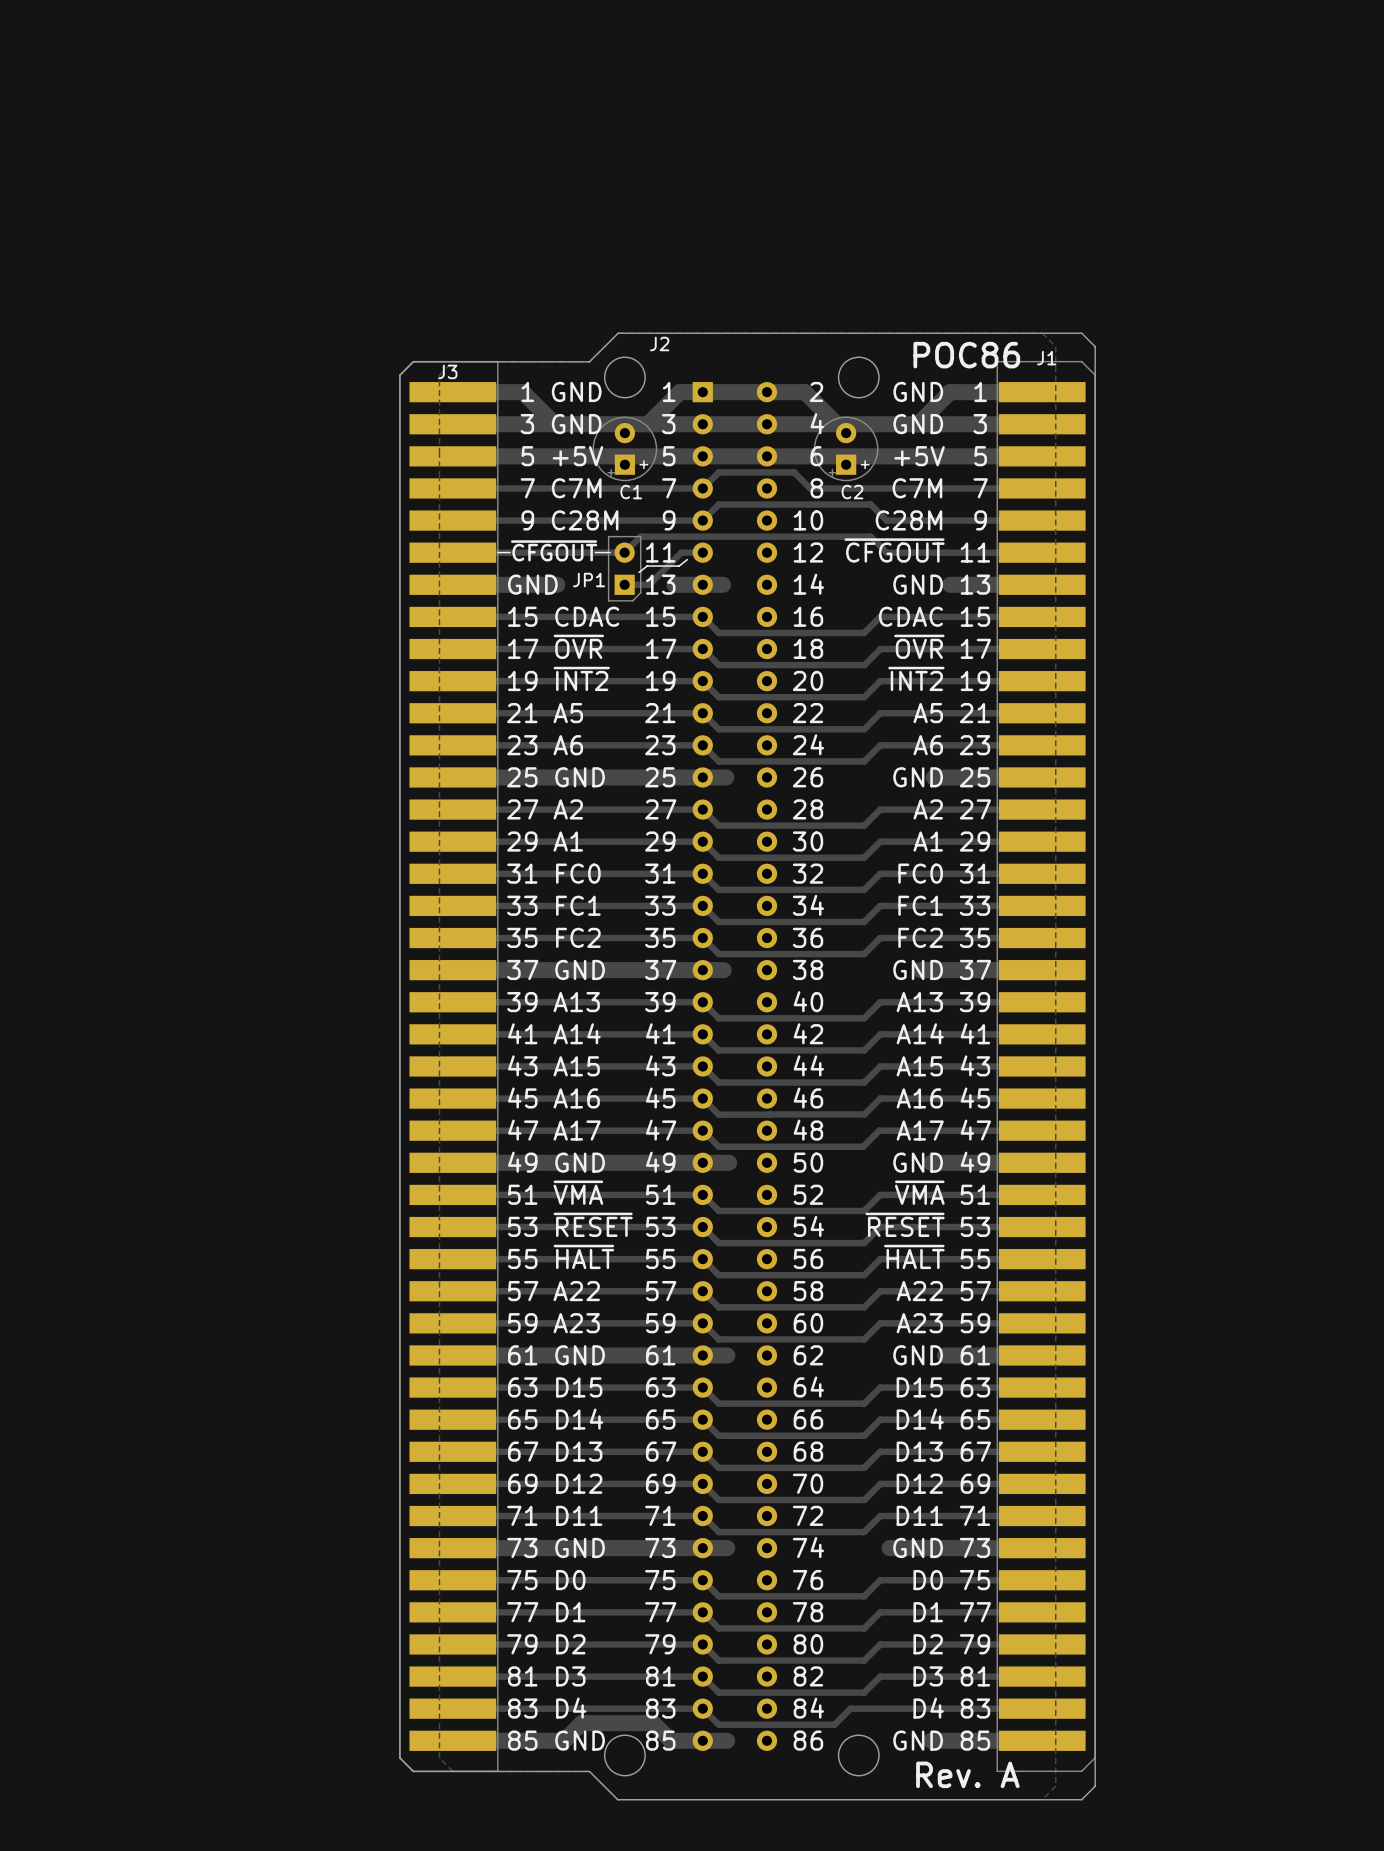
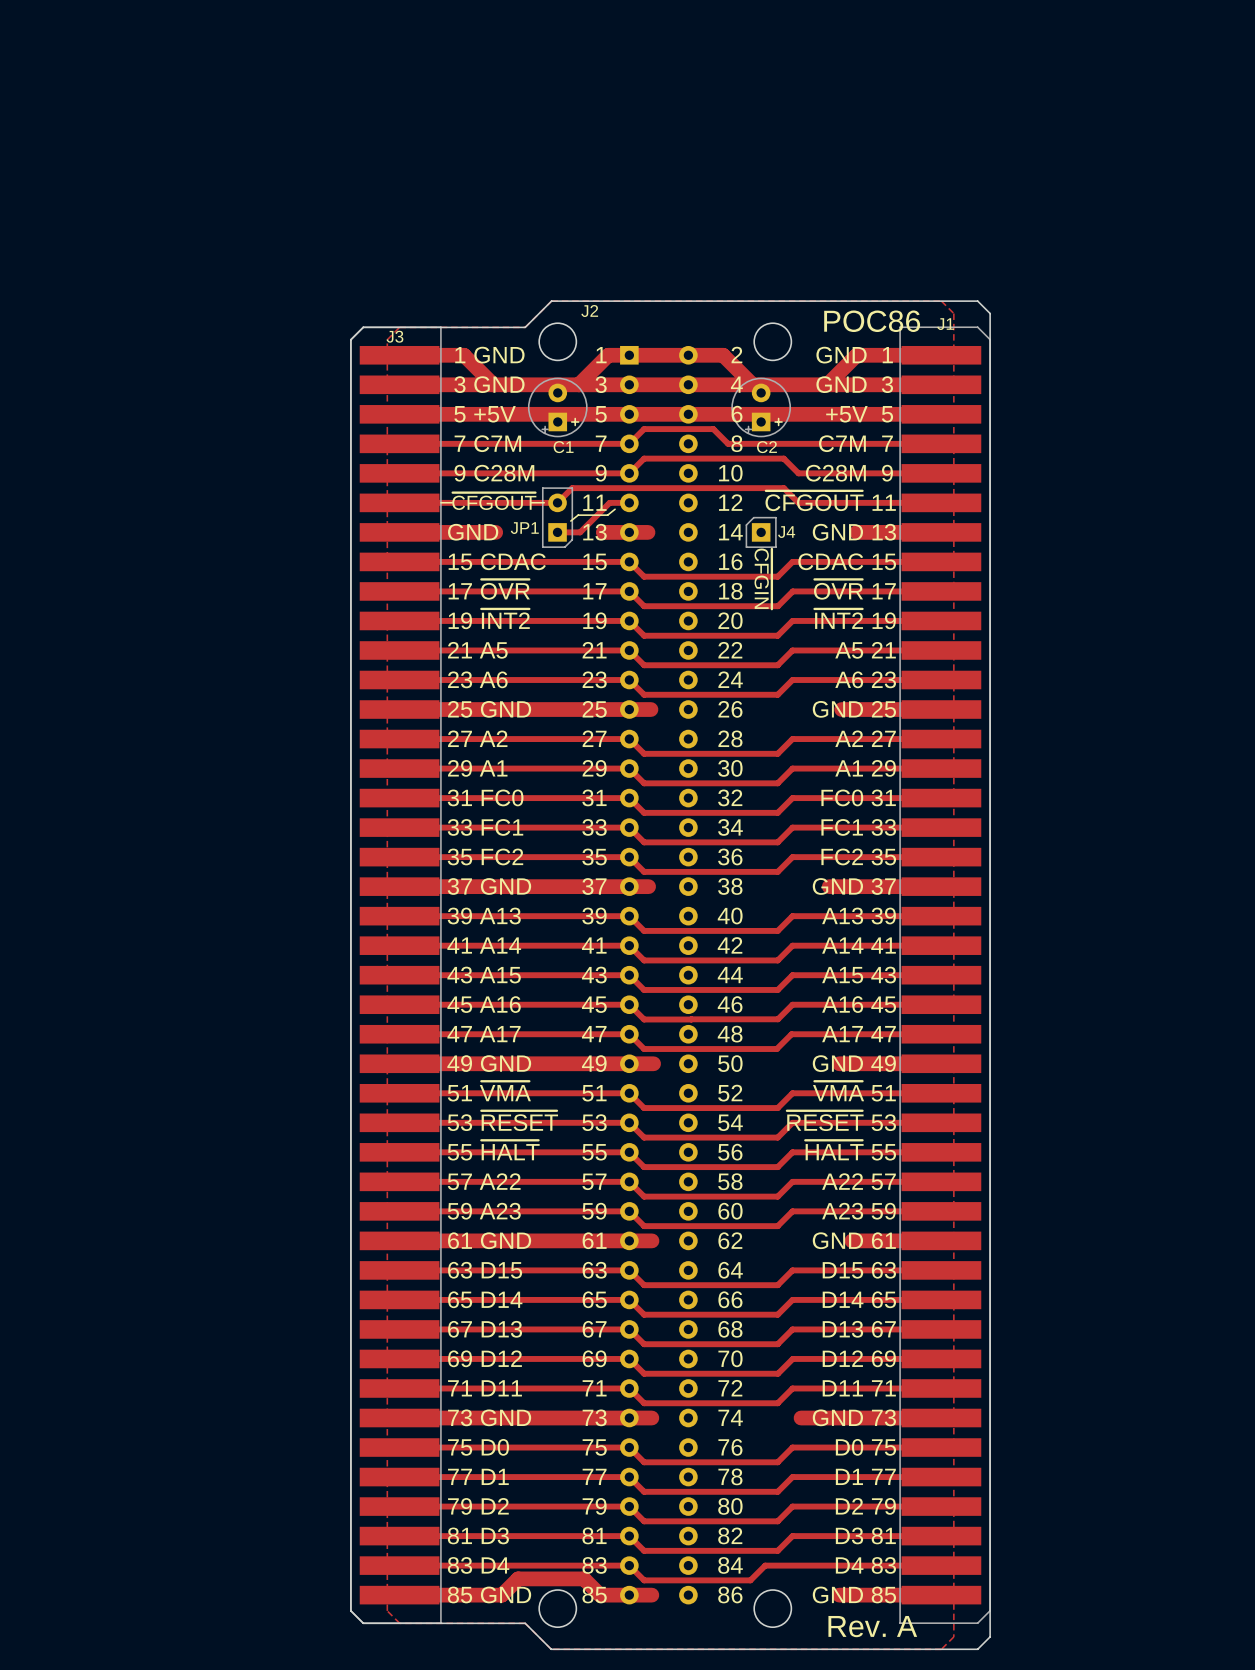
J4: none -> (761, 532)
text: none -> ~{CFGIN} (763, 578)

